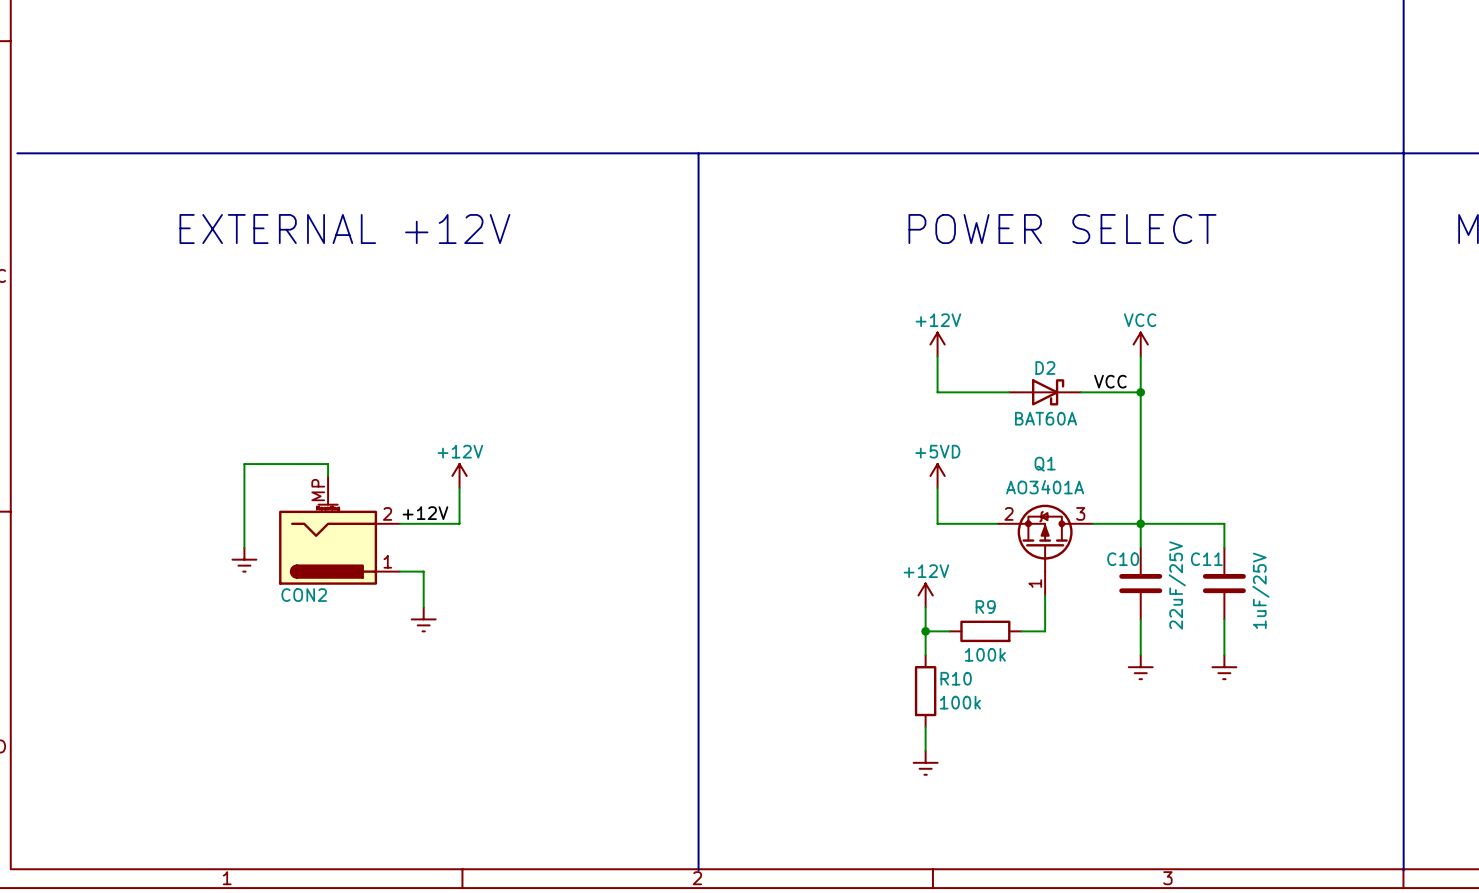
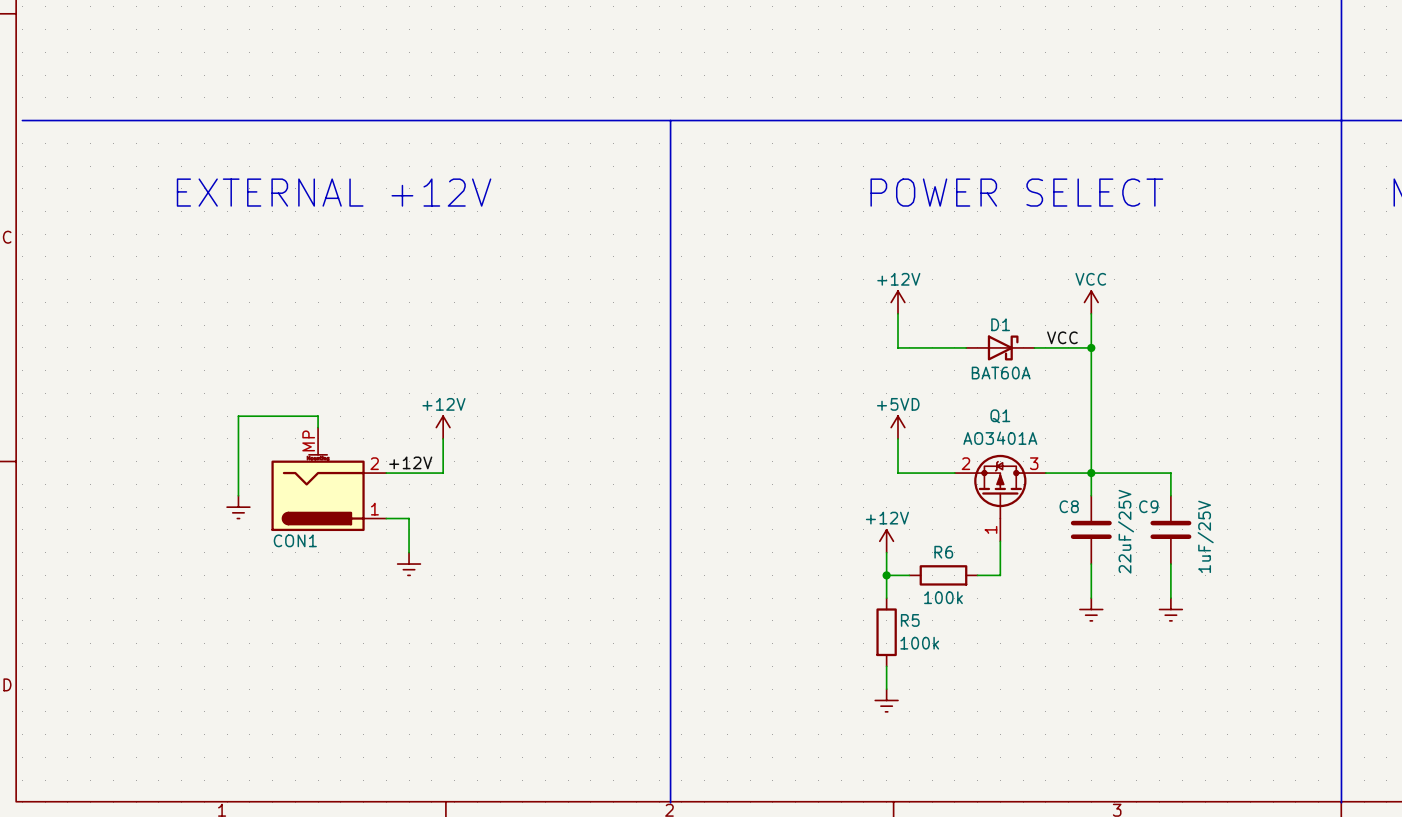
D2 name: D2 (1045, 368) -> D1 (1000, 324)
C10 name: C10 (1123, 559) -> C8 (1069, 506)
C11 name: C11 (1206, 559) -> C9 (1148, 506)
CON2 name: CON2 (304, 595) -> CON1 (295, 540)
R9 name: R9 (985, 607) -> R6 (943, 552)
R10 name: R10 (956, 678) -> R5 (910, 620)

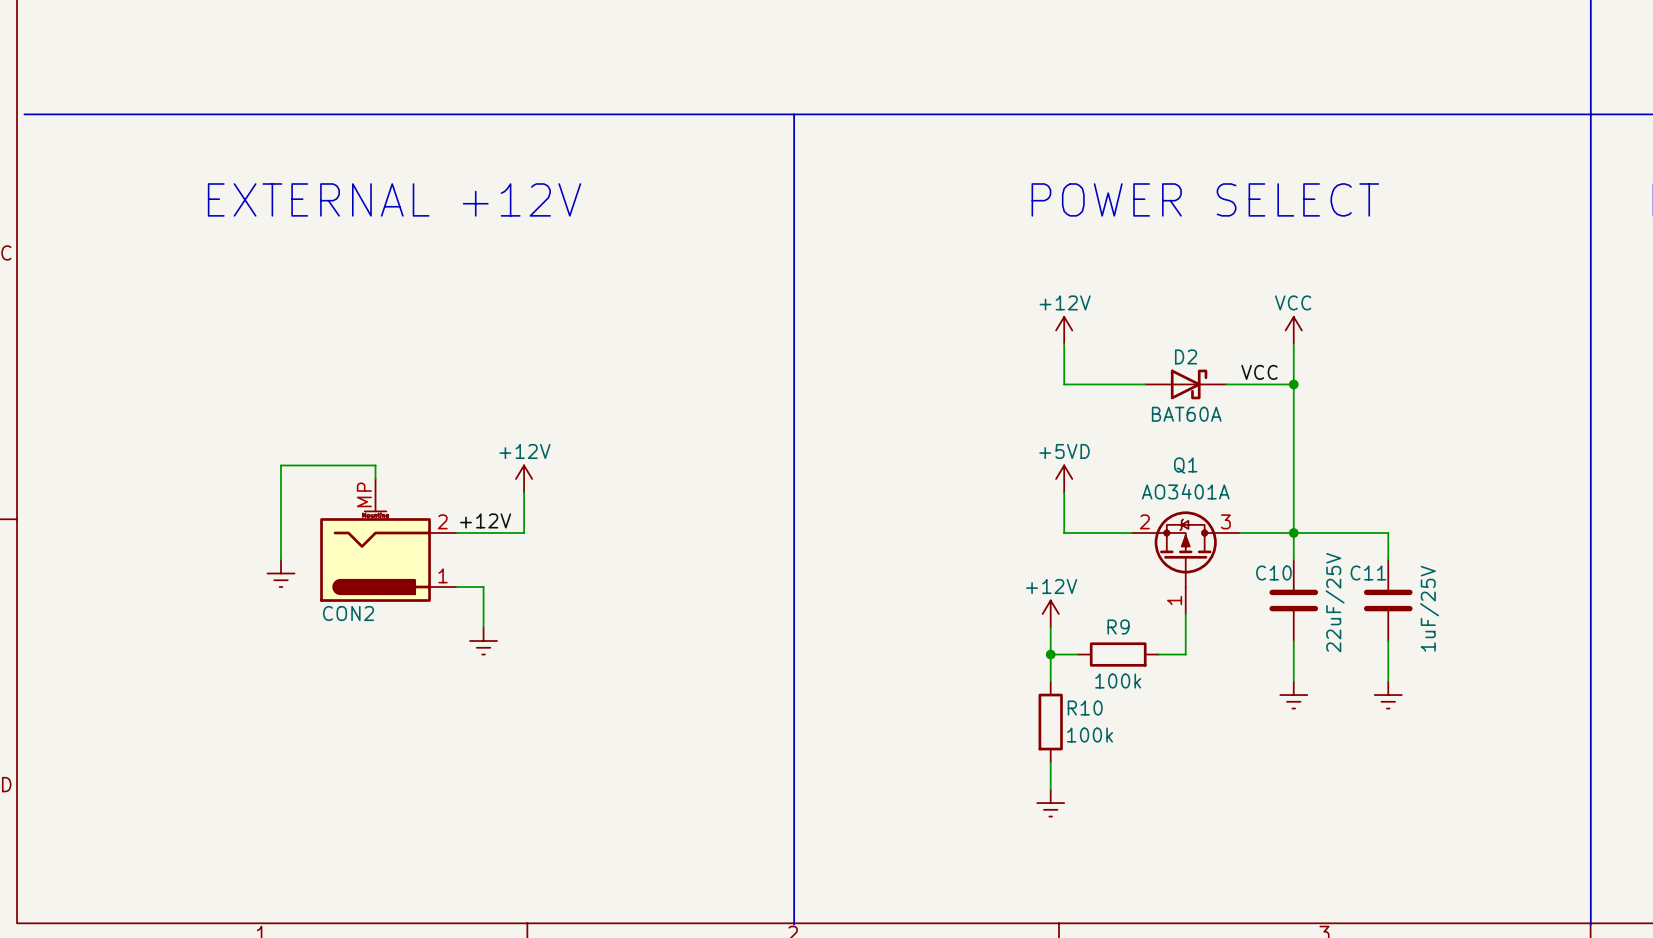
D1 name: D1 (1000, 324) -> D2 (1186, 356)
C8 name: C8 (1069, 506) -> C10 (1273, 573)
C9 name: C9 (1148, 506) -> C11 (1368, 573)
CON1 name: CON1 (295, 540) -> CON2 (348, 613)
R6 name: R6 (943, 552) -> R9 (1118, 627)
R5 name: R5 (910, 620) -> R10 (1085, 708)

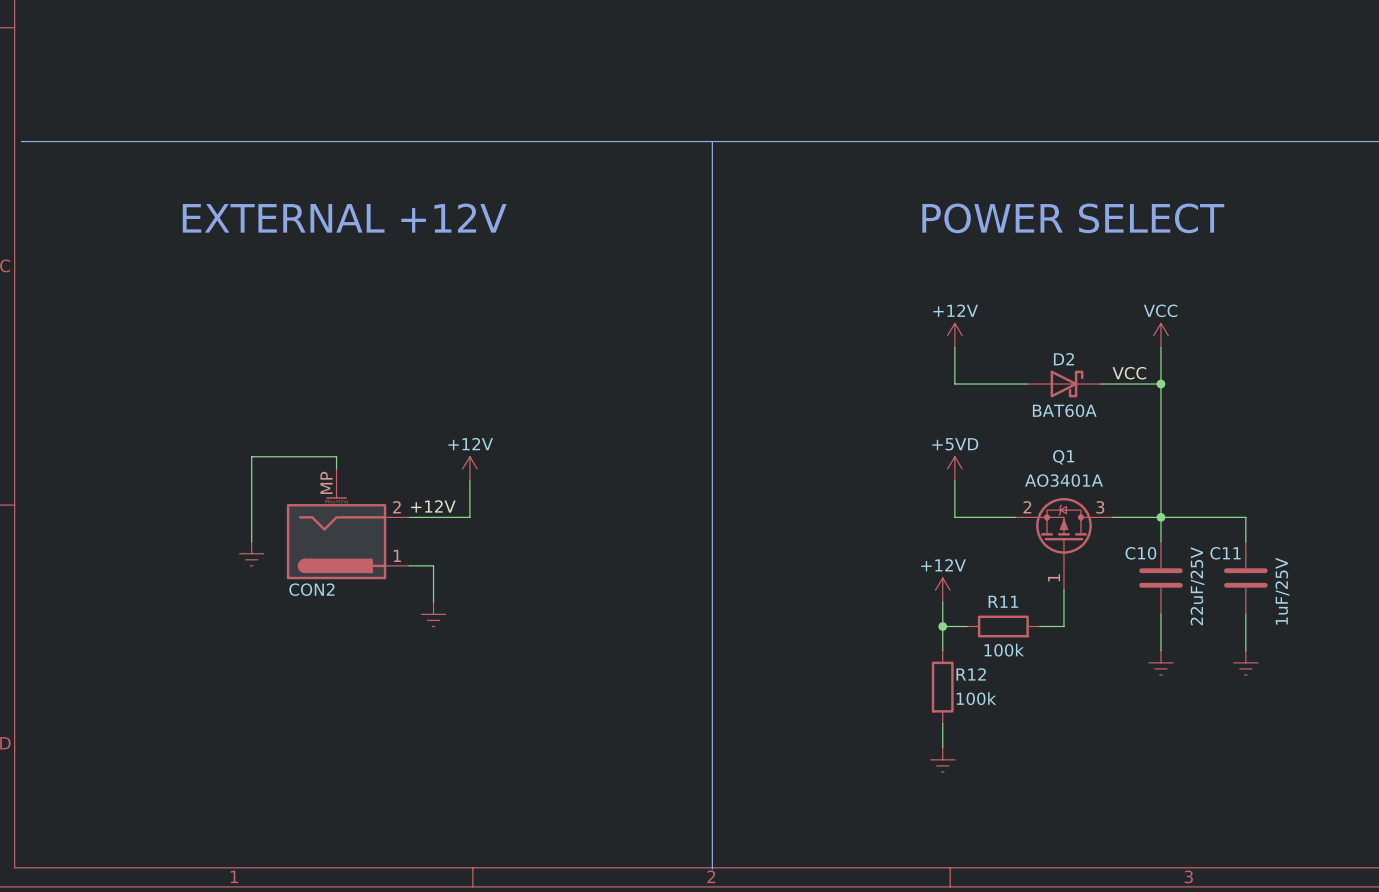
R9 name: R9 (1118, 627) -> R11 (1003, 601)
R10 name: R10 (1085, 708) -> R12 (971, 674)

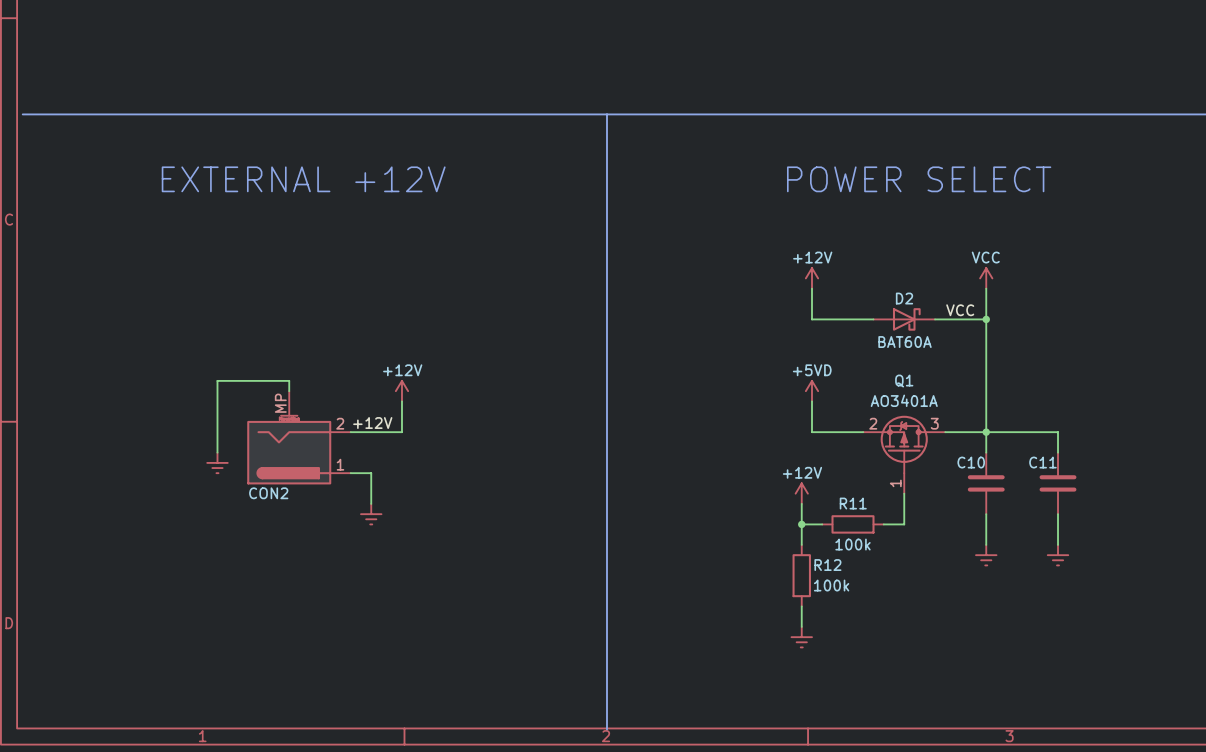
C10 value: 22uF/25V (1197, 586) -> none
C11 value: 1uF/25V (1282, 591) -> none

